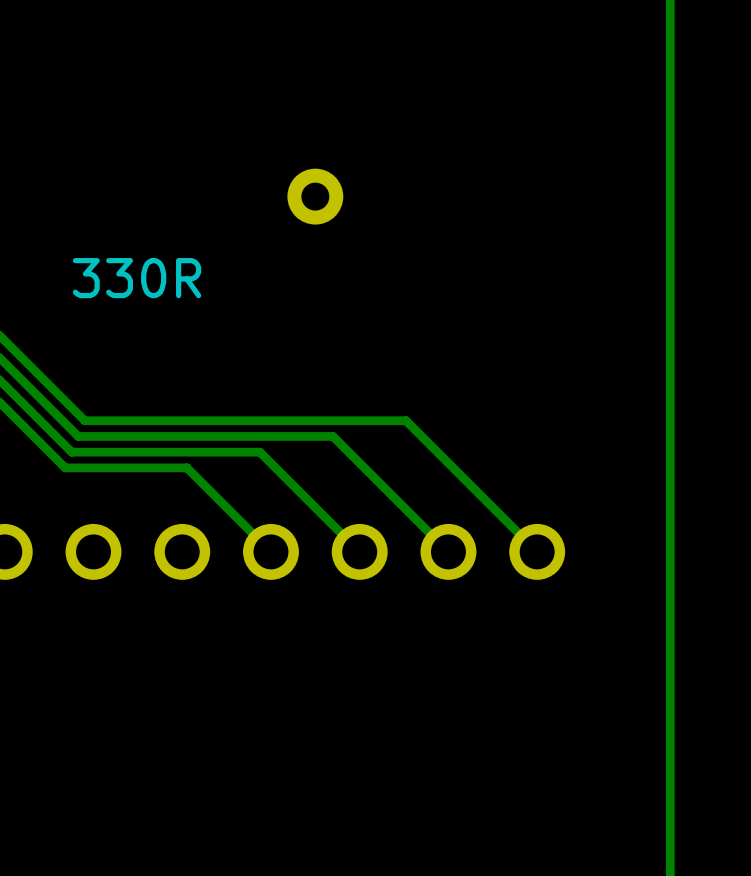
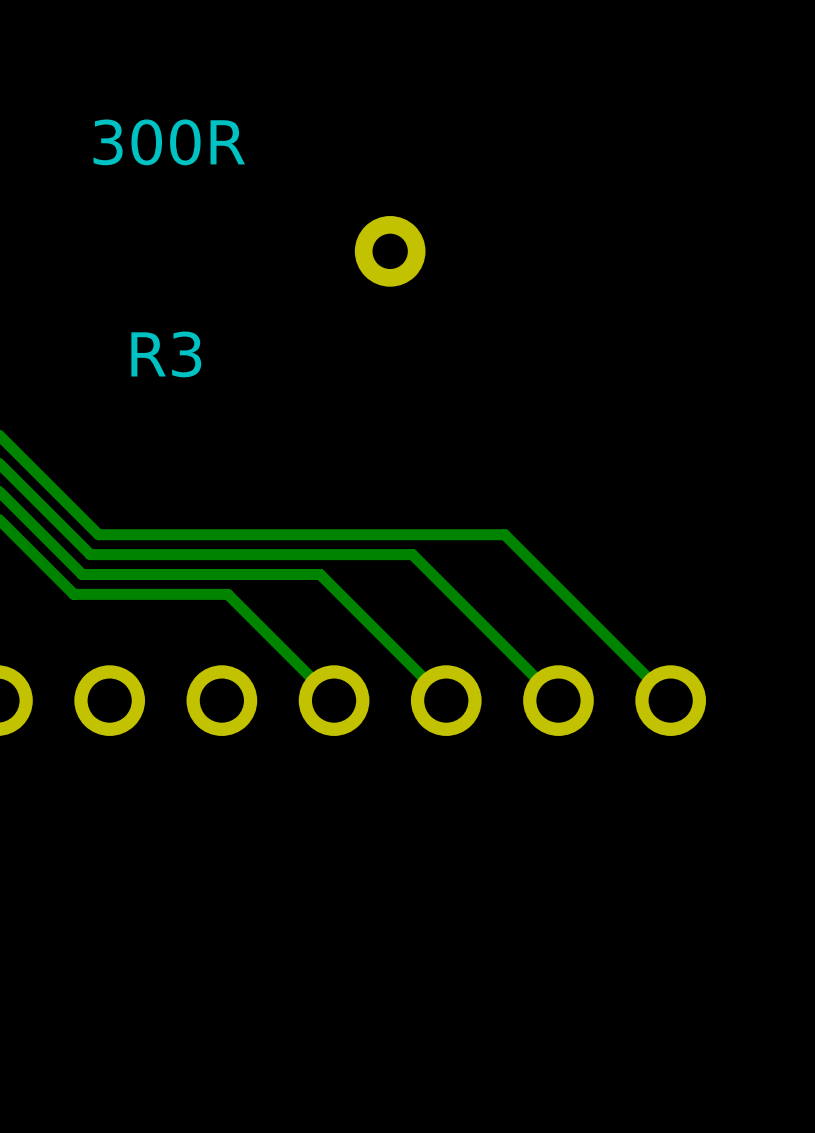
text: none -> 300R (169, 142)
330R name: 330R (137, 278) -> R3 (166, 354)

